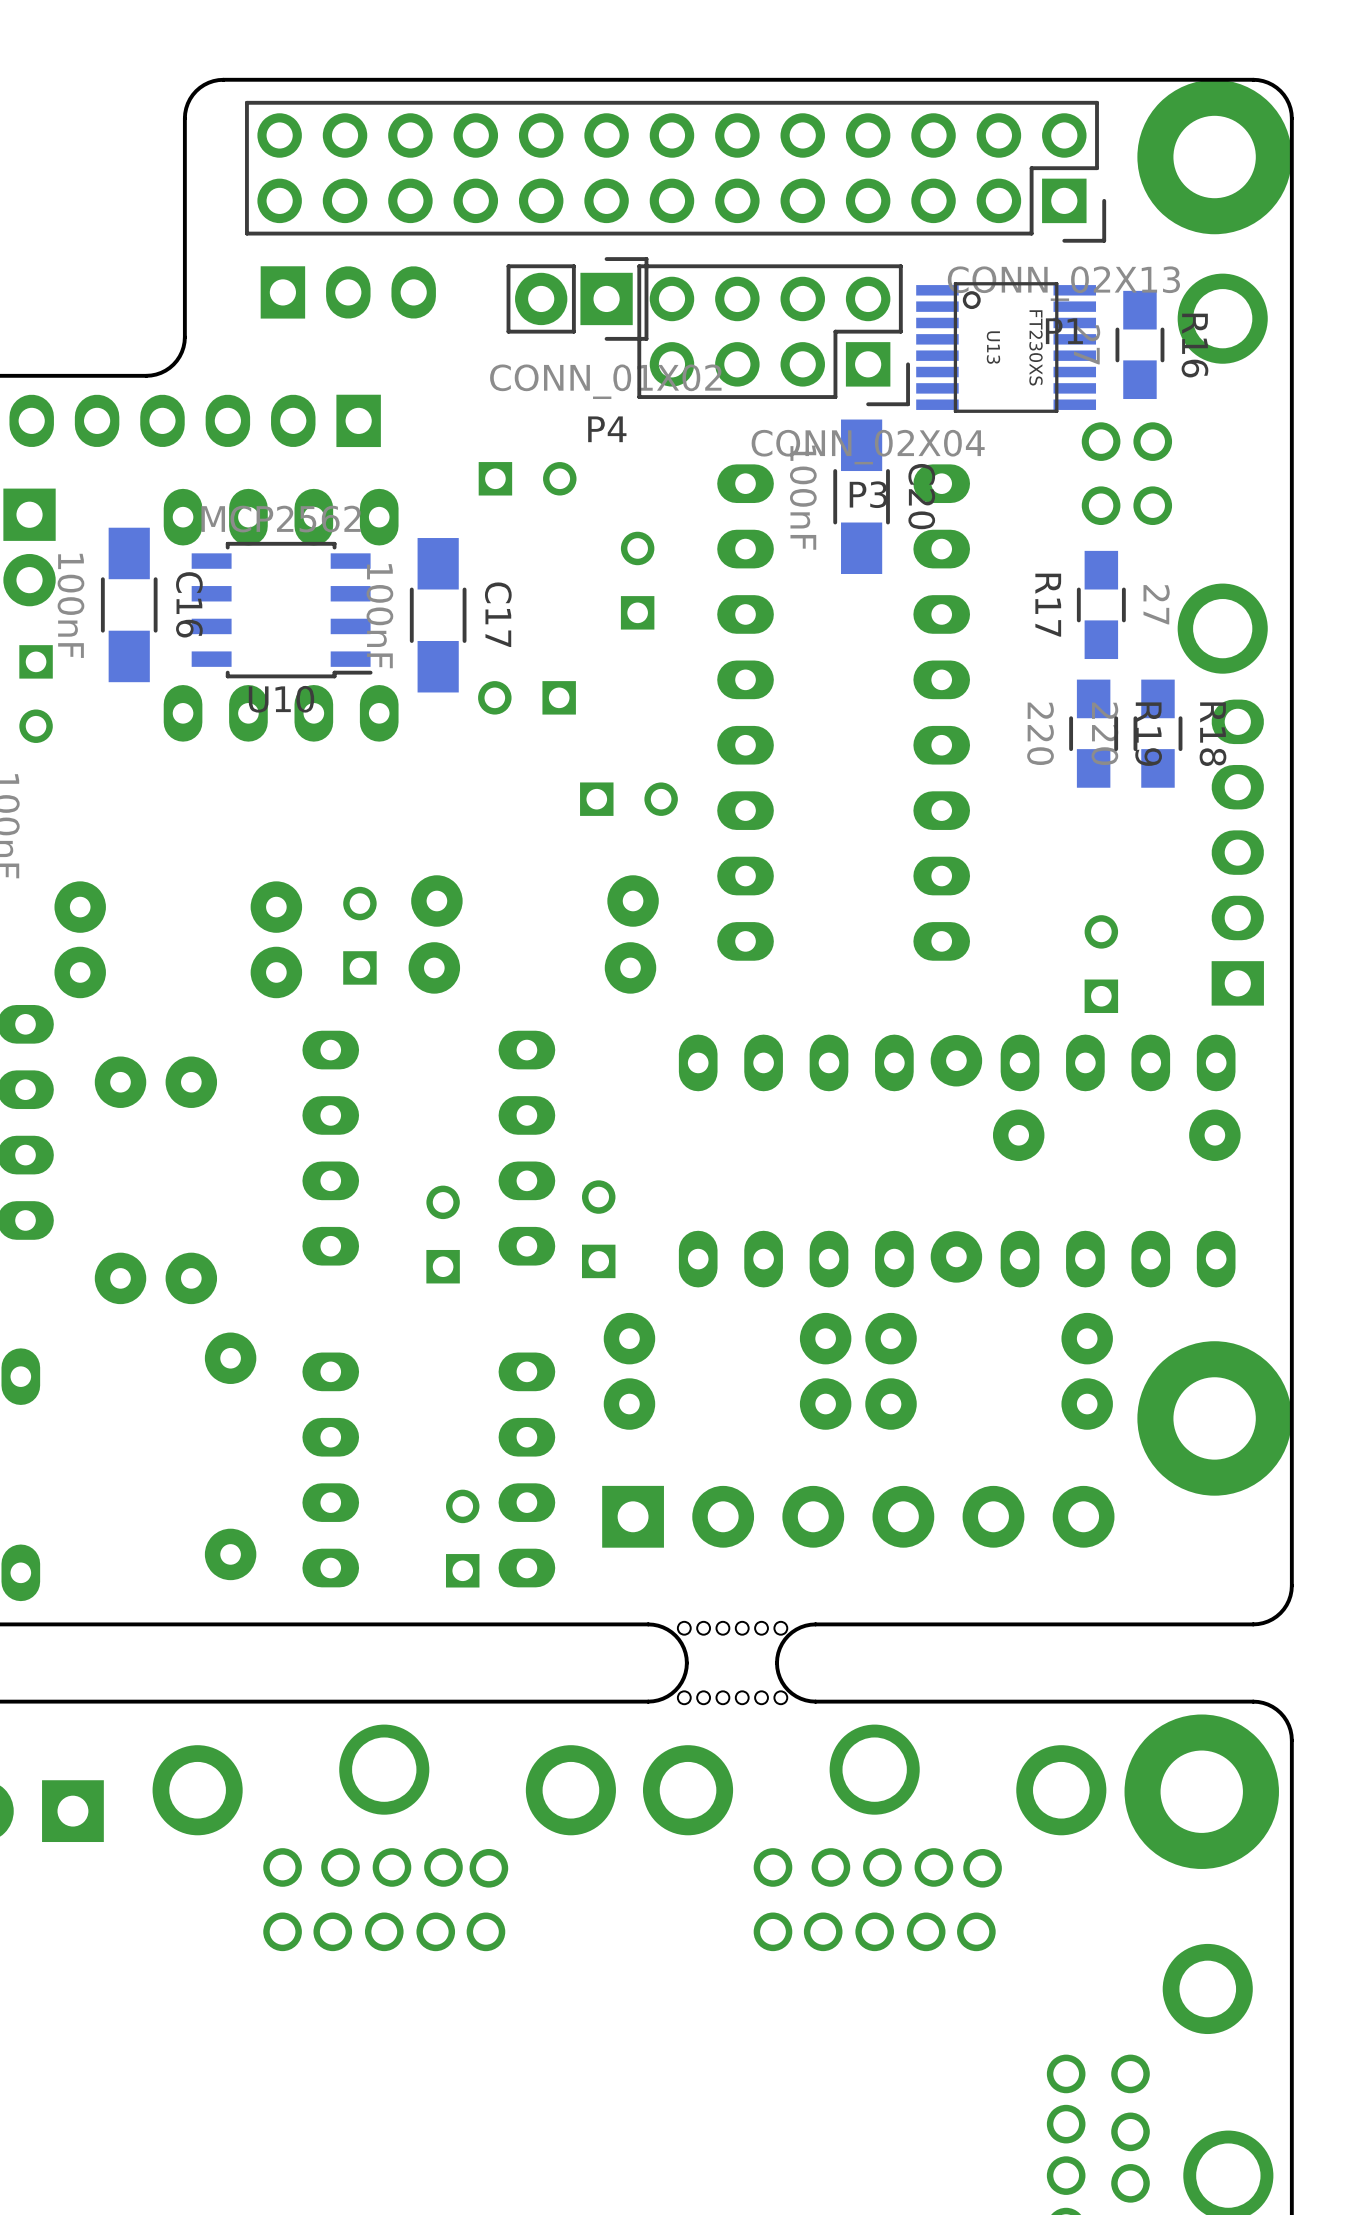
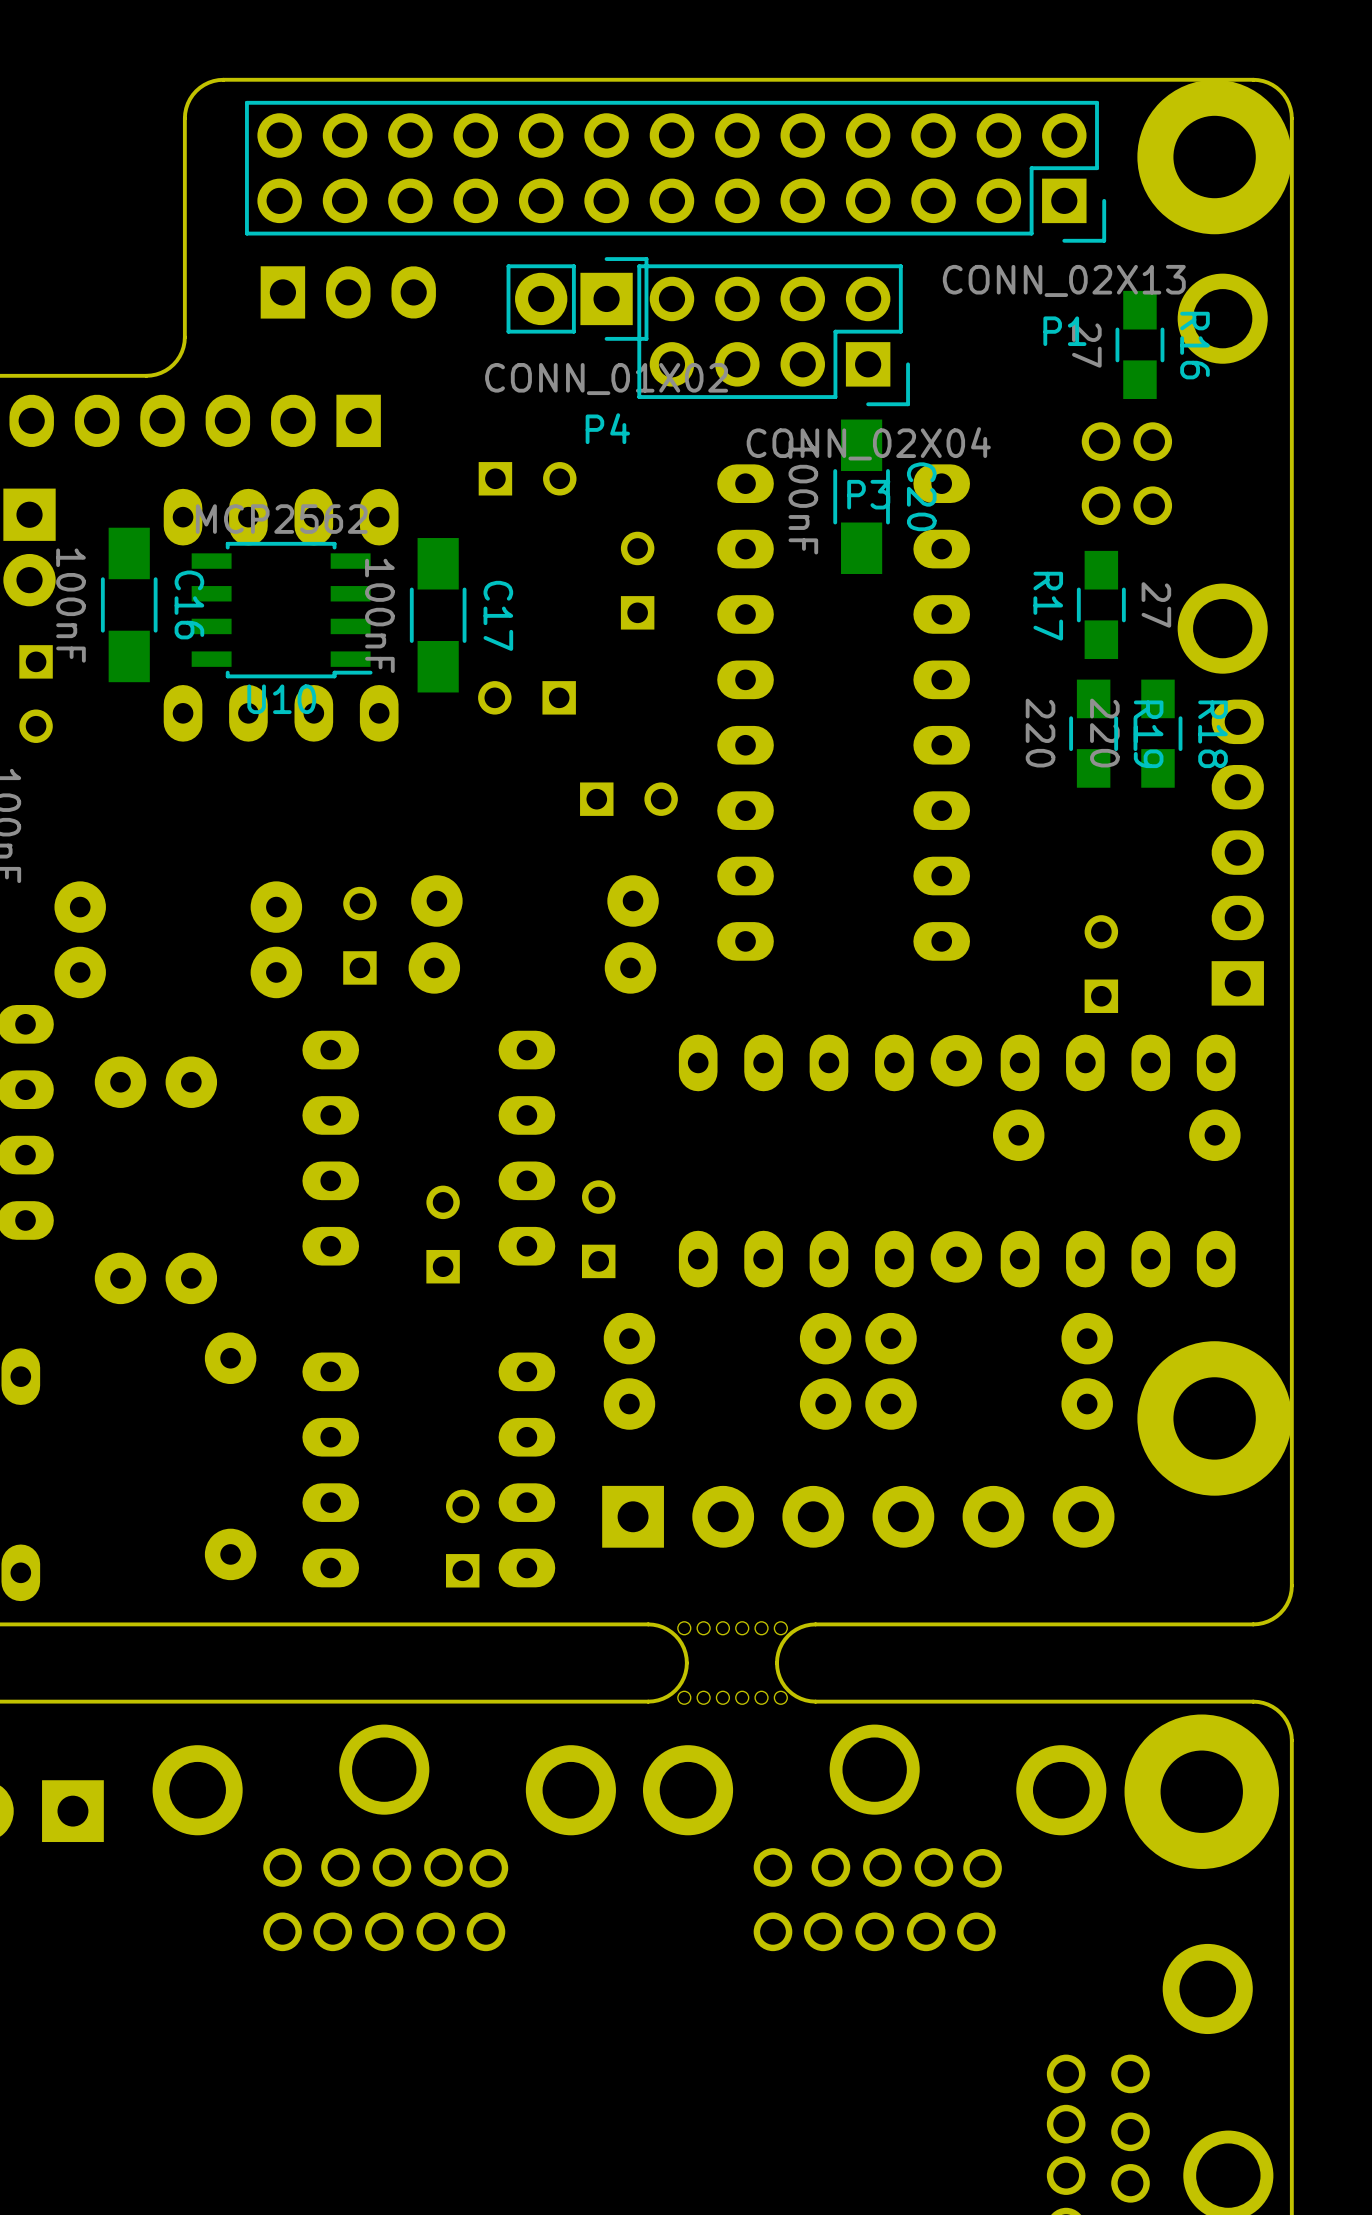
U13: FT230XS (1006, 347) -> none

